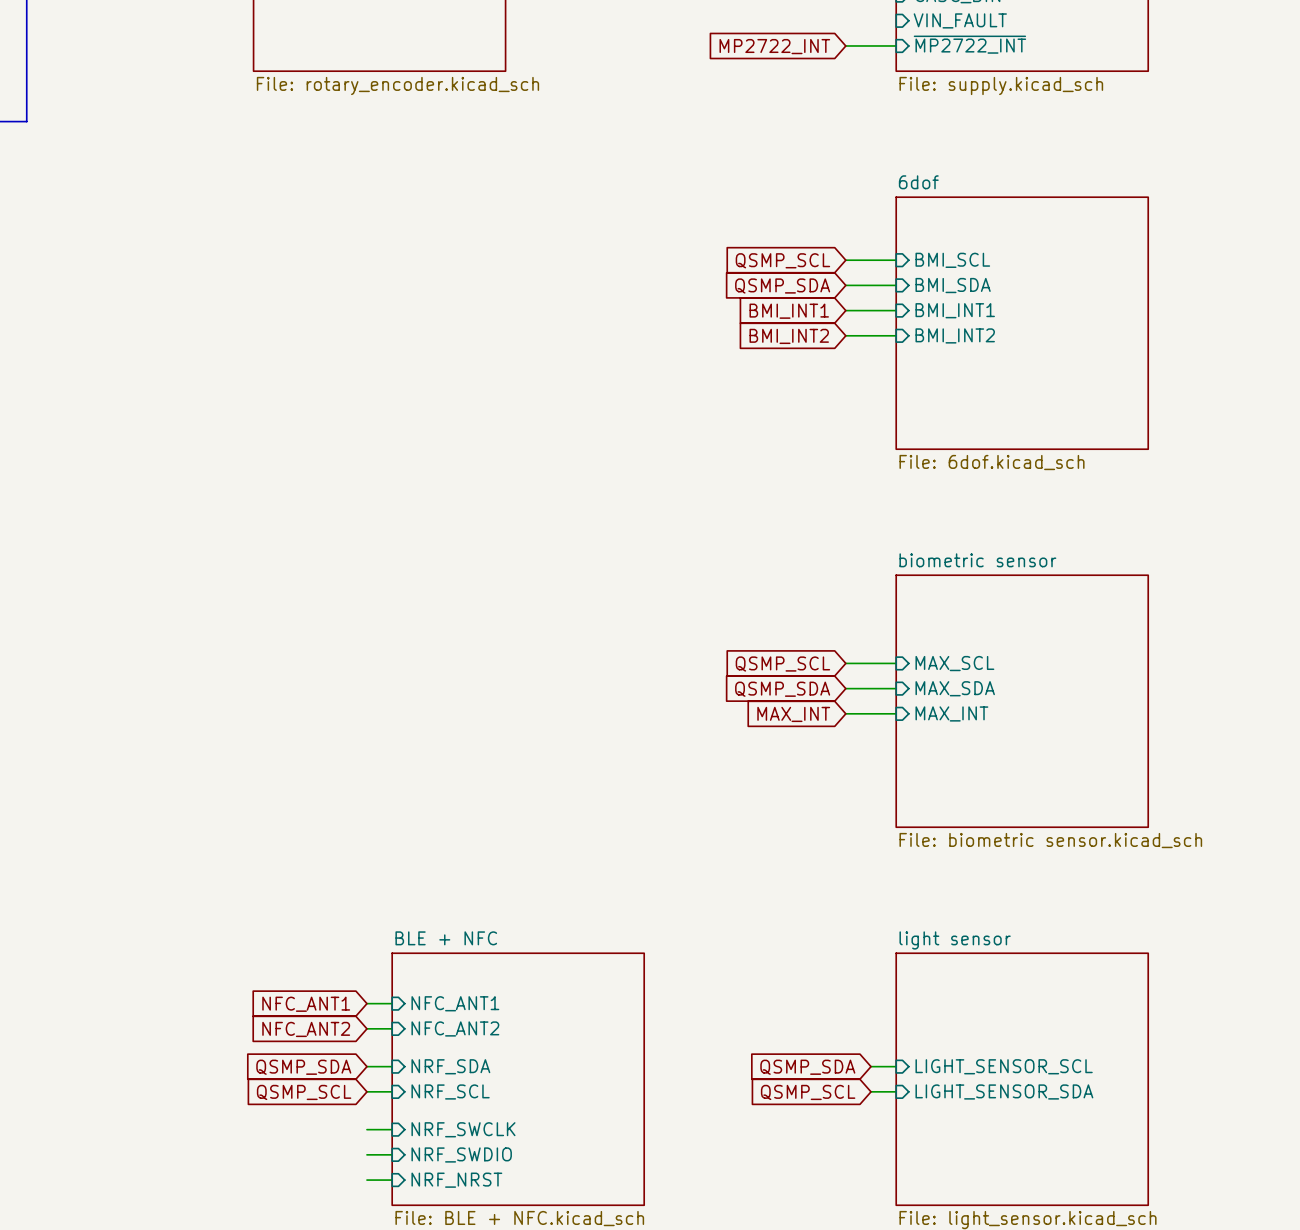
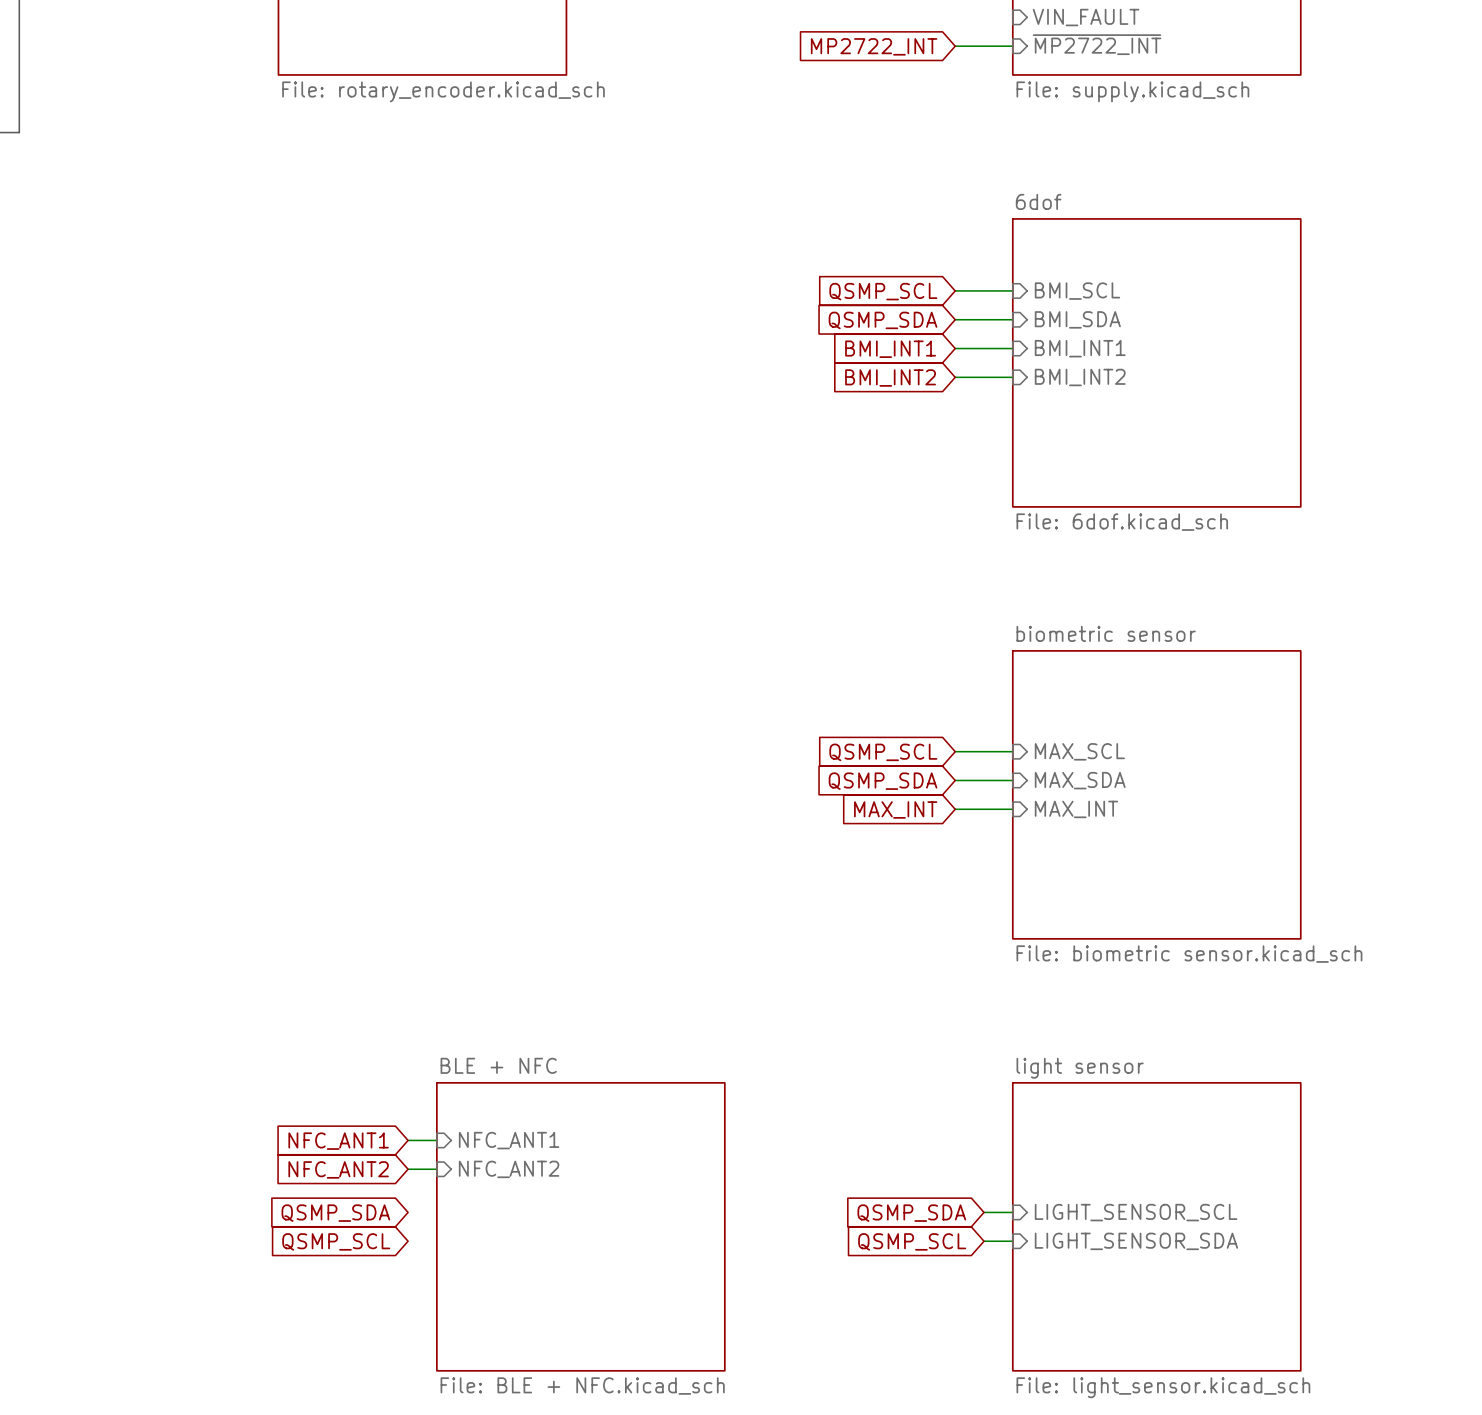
wire: (366, 1066) (392, 1066) -> none
sheet pin: NRF_SDA (450, 1066) -> none
wire: (366, 1091) (392, 1091) -> none
sheet pin: NRF_SCL (450, 1091) -> none
wire: (366, 1129) (392, 1129) -> none
sheet pin: NRF_SWCLK (463, 1129) -> none
wire: (366, 1154) (392, 1154) -> none
sheet pin: NRF_SWDIO (461, 1154) -> none
wire: (366, 1180) (392, 1180) -> none
sheet pin: NRF_NRST (456, 1180) -> none

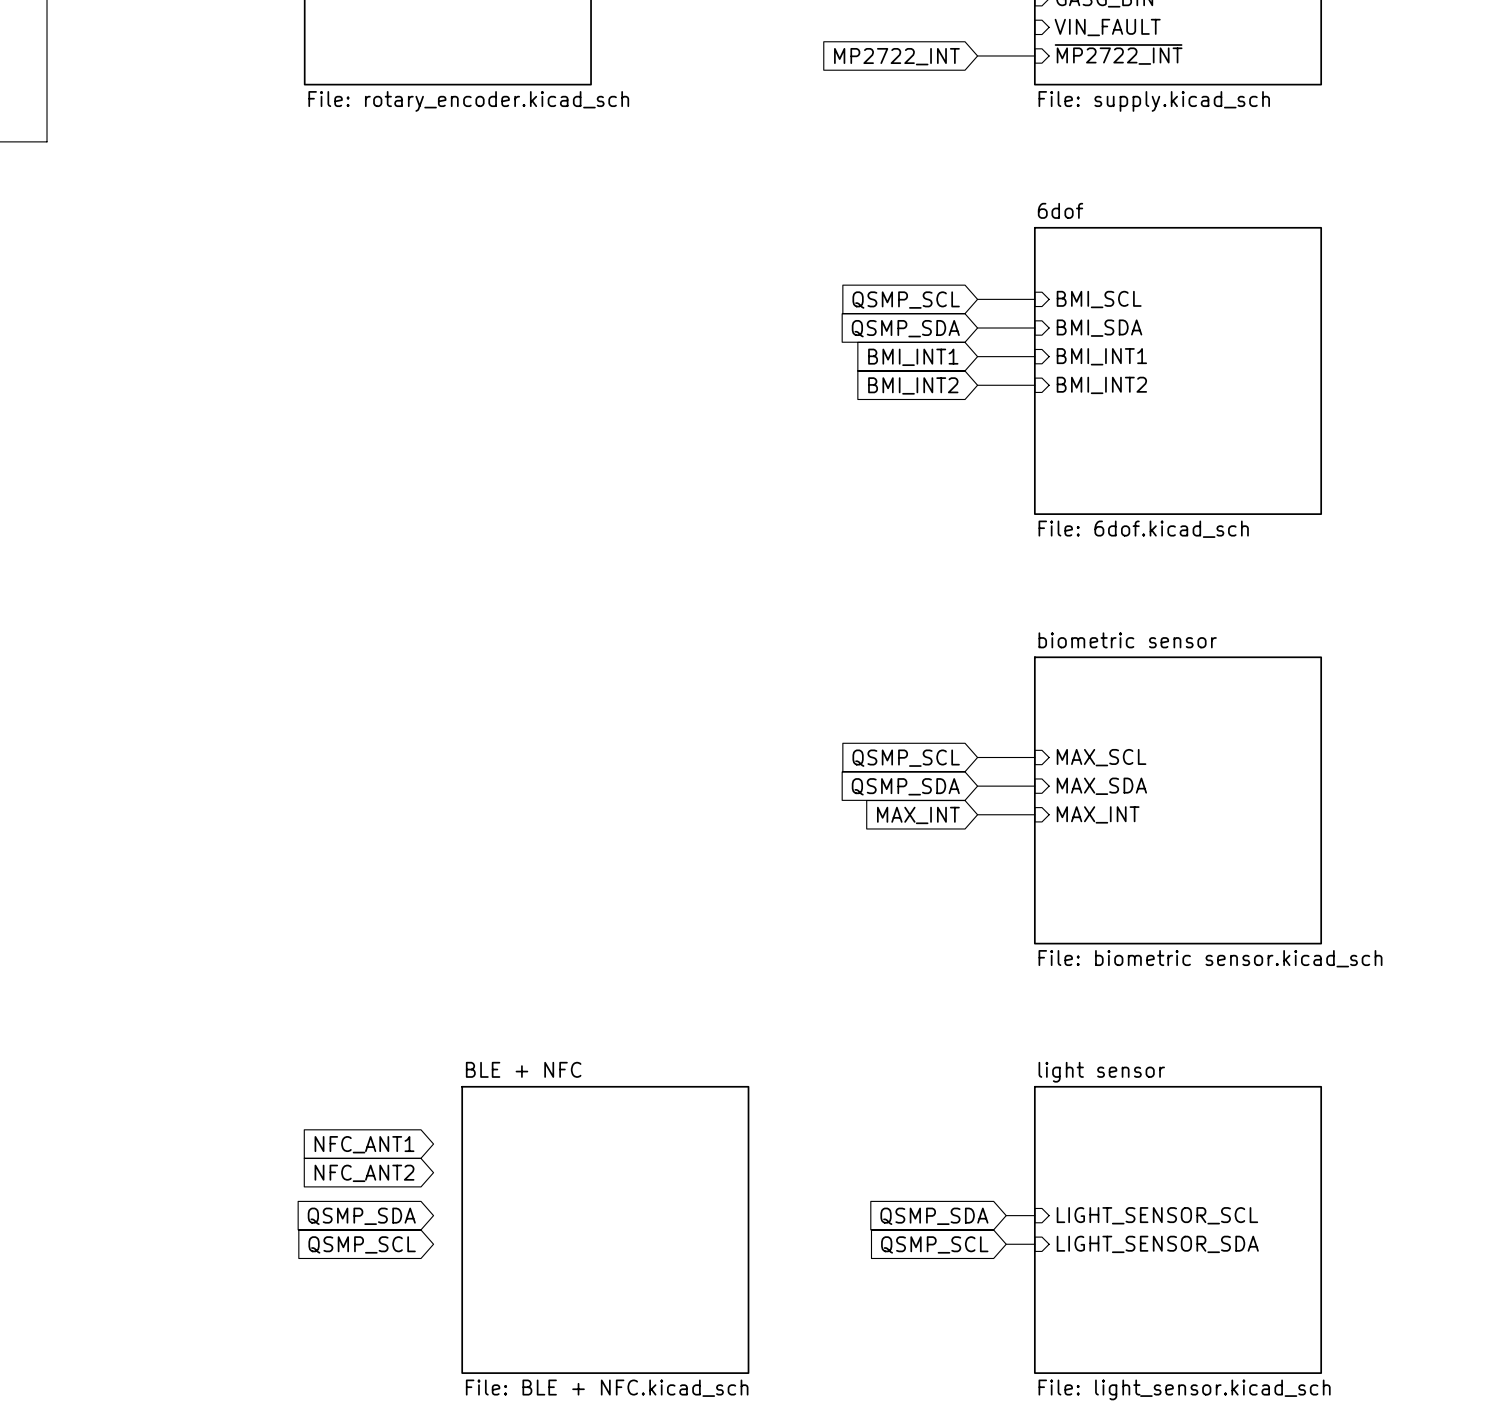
wire: (408, 1140) (436, 1140) -> none
sheet pin: NFC_ANT1 (509, 1140) -> none
wire: (408, 1169) (436, 1169) -> none
sheet pin: NFC_ANT2 (509, 1169) -> none

